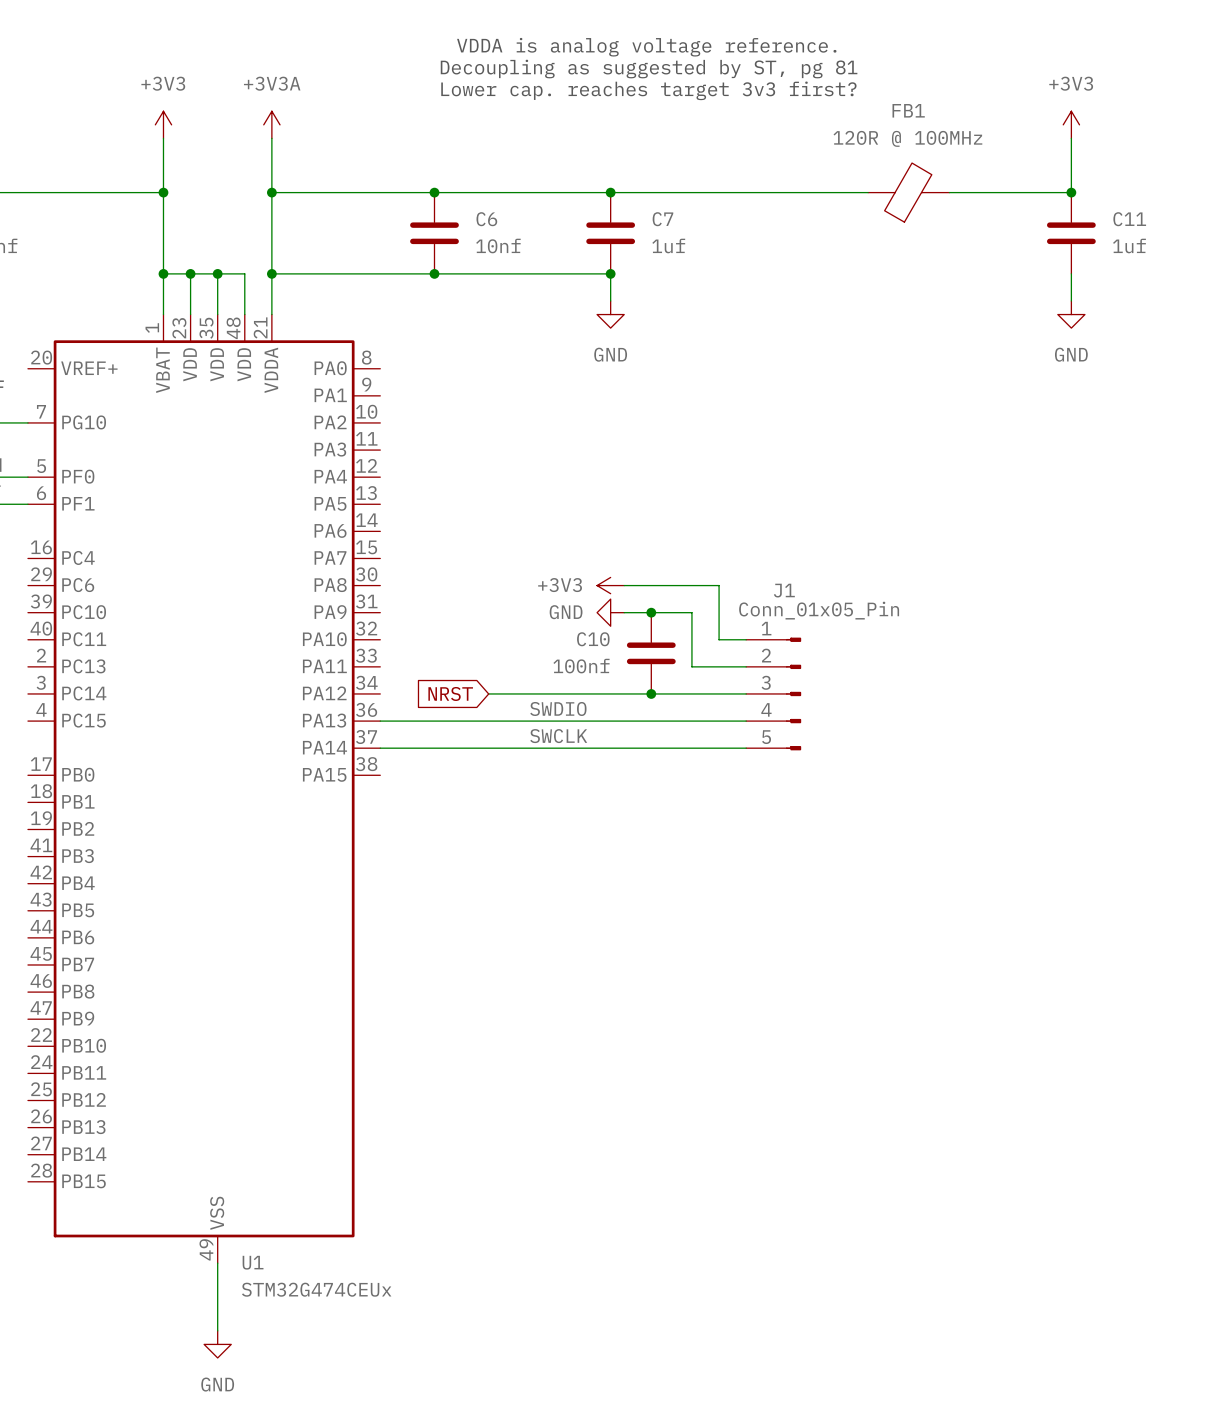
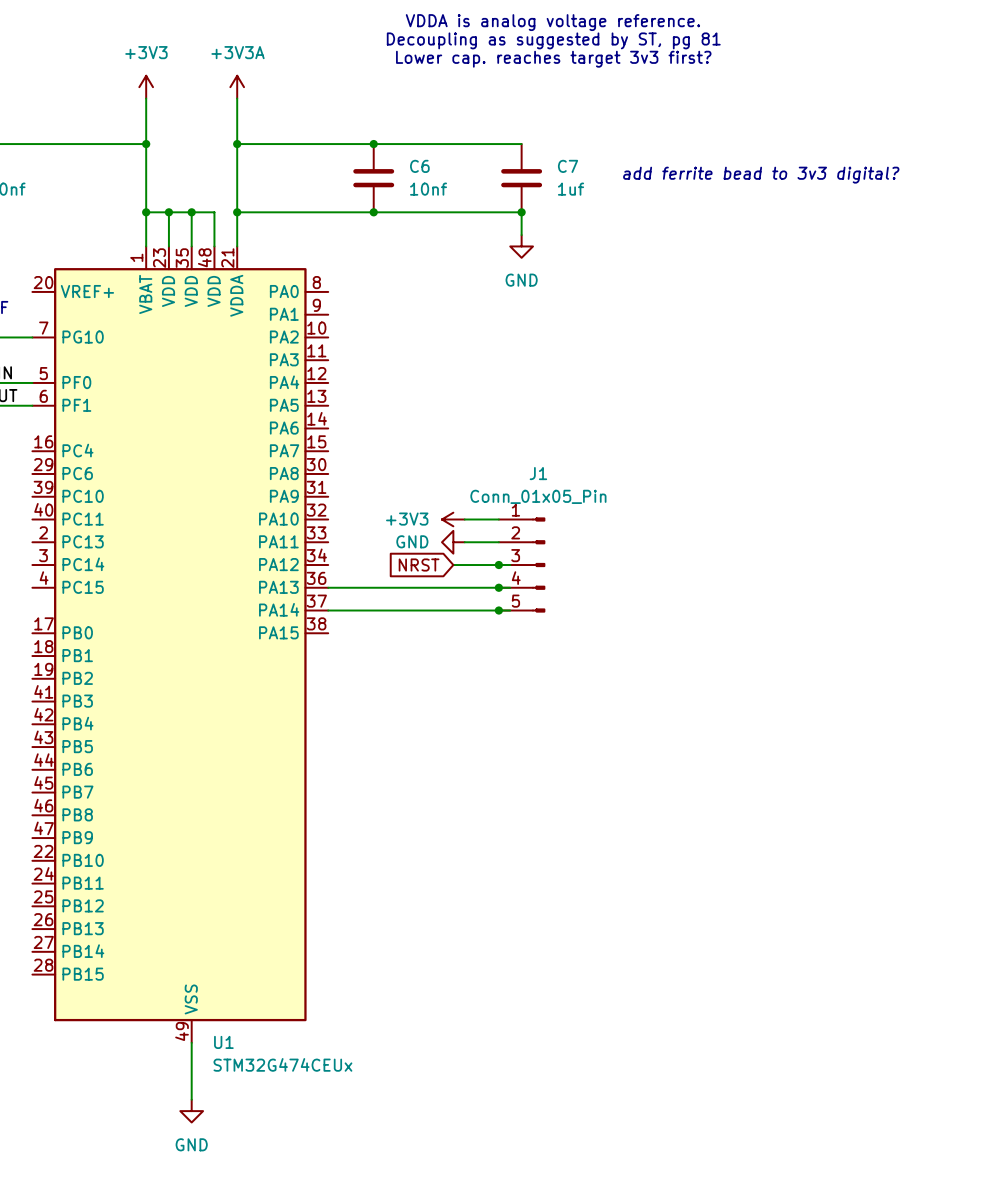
power symbol: +3V3 (1071, 124) -> none
wire: (1071, 138) (1071, 192) (949, 192) -> none
wire: (610, 192) (868, 192) -> none
junction: (610, 192) -> none
FB1: 120R @ 100MHz (908, 192) -> none
junction: (1071, 192) -> none
text: none -> add ferrite bead to 3v3 digital? (761, 175)
C11: 1uf (1071, 233) -> none
wire: (1071, 273) (1071, 301) -> none
power symbol: GND (1071, 314) -> none
power symbol position: +3V3 (610, 585) -> +3V3 (453, 519)
wire: (624, 585) (719, 585) (719, 639) (746, 639) -> none
J1 name position: J1 (784, 590) -> J1 (538, 473)
J1 value position: Conn_01x05_Pin (819, 610) -> Conn_01x05_Pin (538, 496)
power symbol position: GND (610, 612) -> GND (453, 542)
wire: (624, 612) (691, 612) (691, 666) (746, 666) -> none
junction: (651, 612) -> none
wire: none -> (464, 519) (498, 519)
C10: 100nf (651, 653) -> none
global label position: NRST (450, 693) -> NRST (419, 565)
wire: (488, 693) (529, 693) -> (464, 542) (498, 542)
junction: none -> (498, 565)
wire: (597, 693) (746, 693) -> none
junction: (651, 693) -> none
J1 position: (773, 693) -> (521, 565)
label: SWDIO (558, 708) -> none
junction: none -> (498, 587)
wire: (597, 721) (746, 721) -> none
label: SWCLK (558, 736) -> none
junction: none -> (498, 610)
wire: (597, 748) (746, 748) -> none

